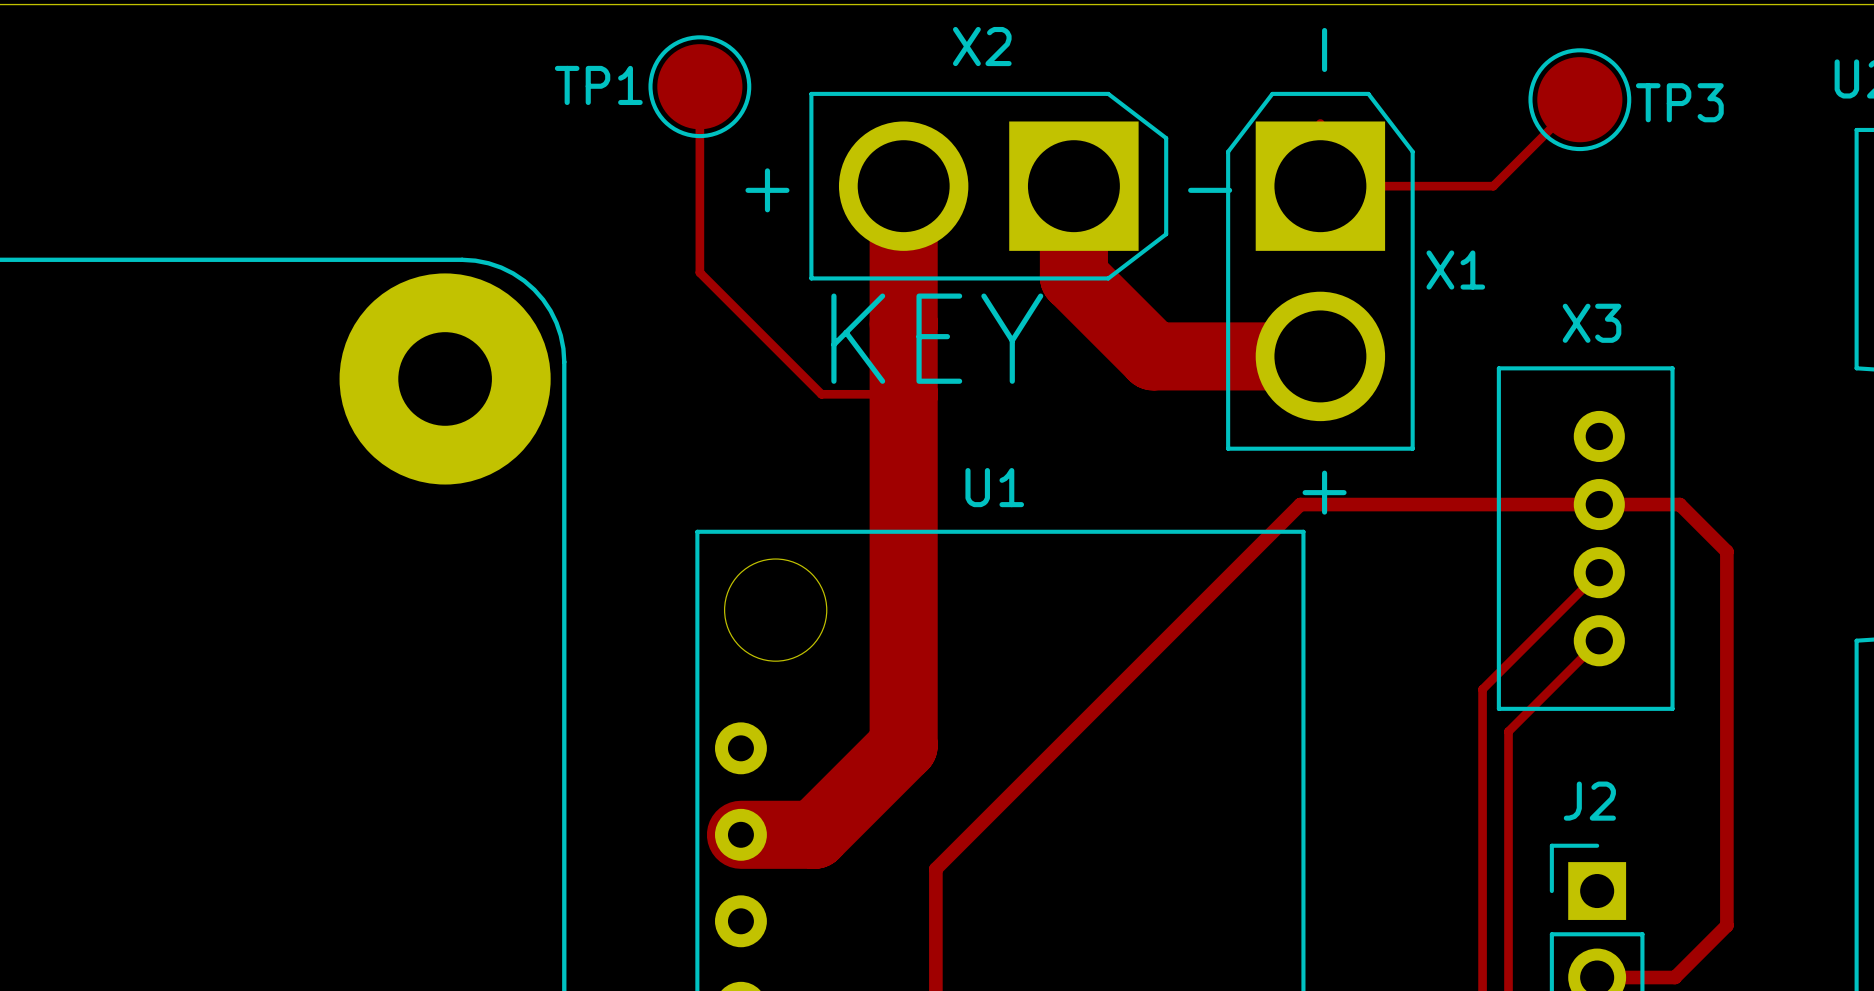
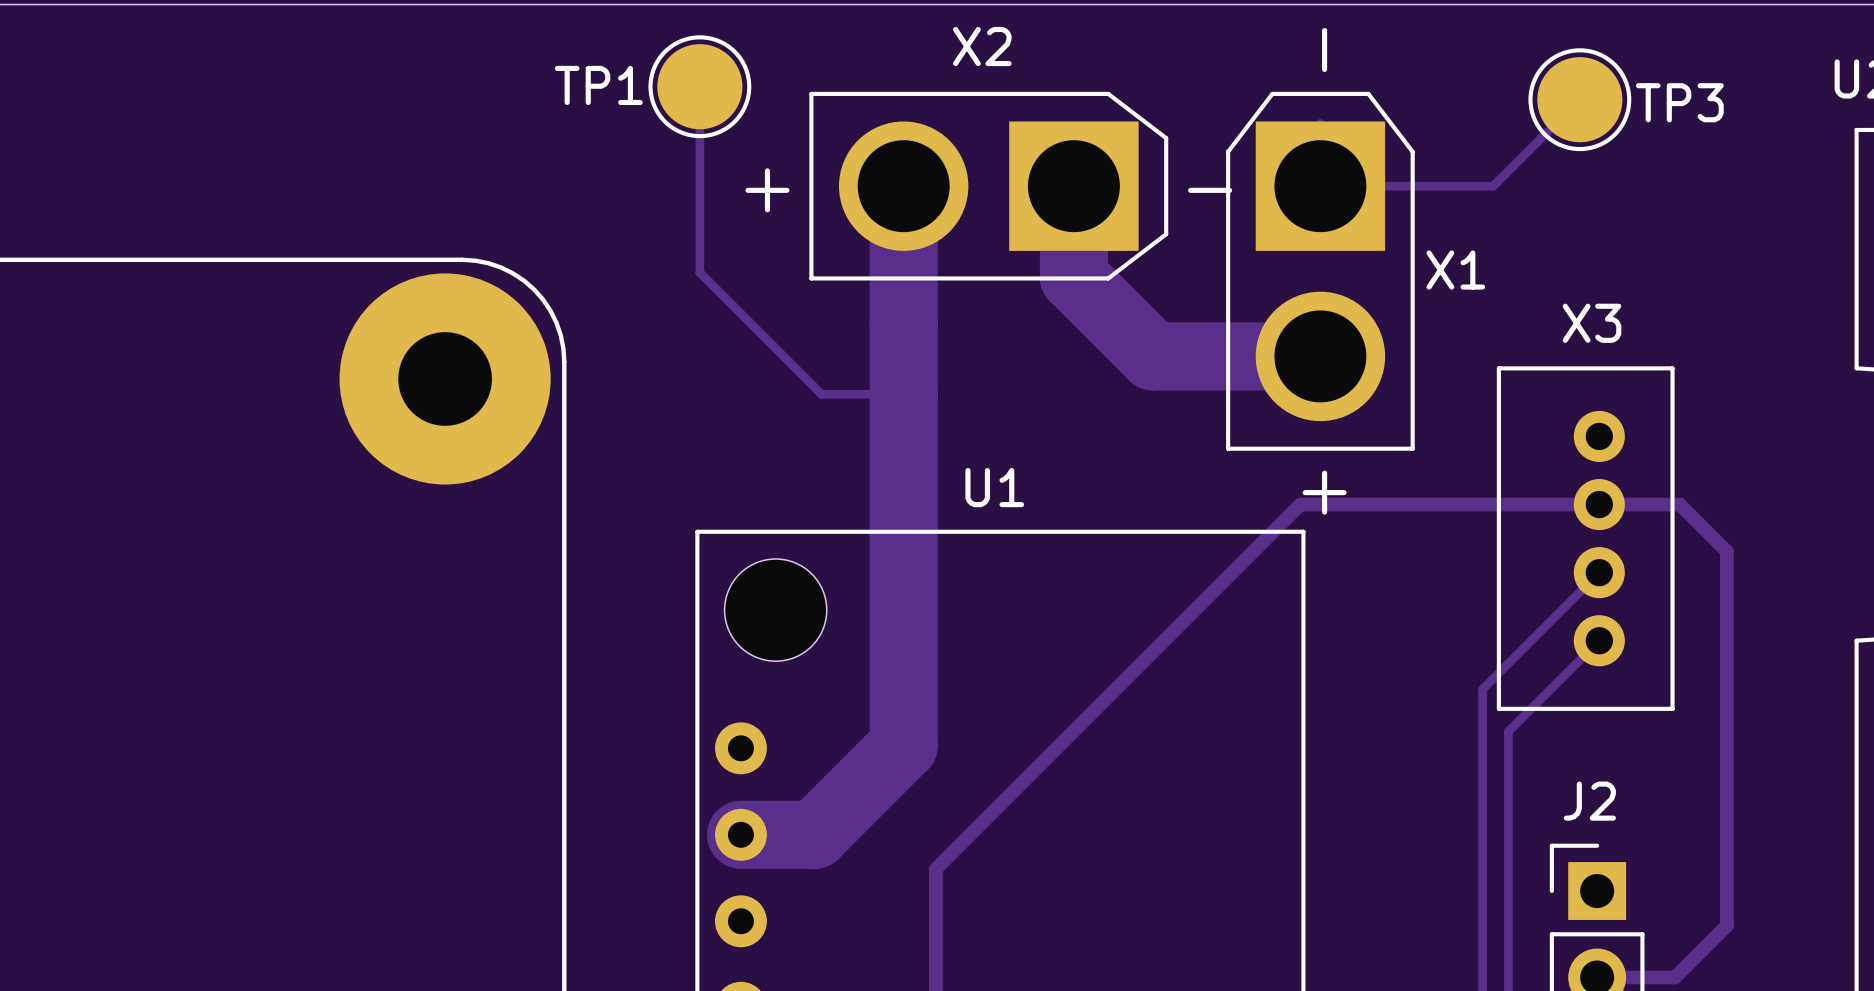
text: KEY (937, 338) -> none

